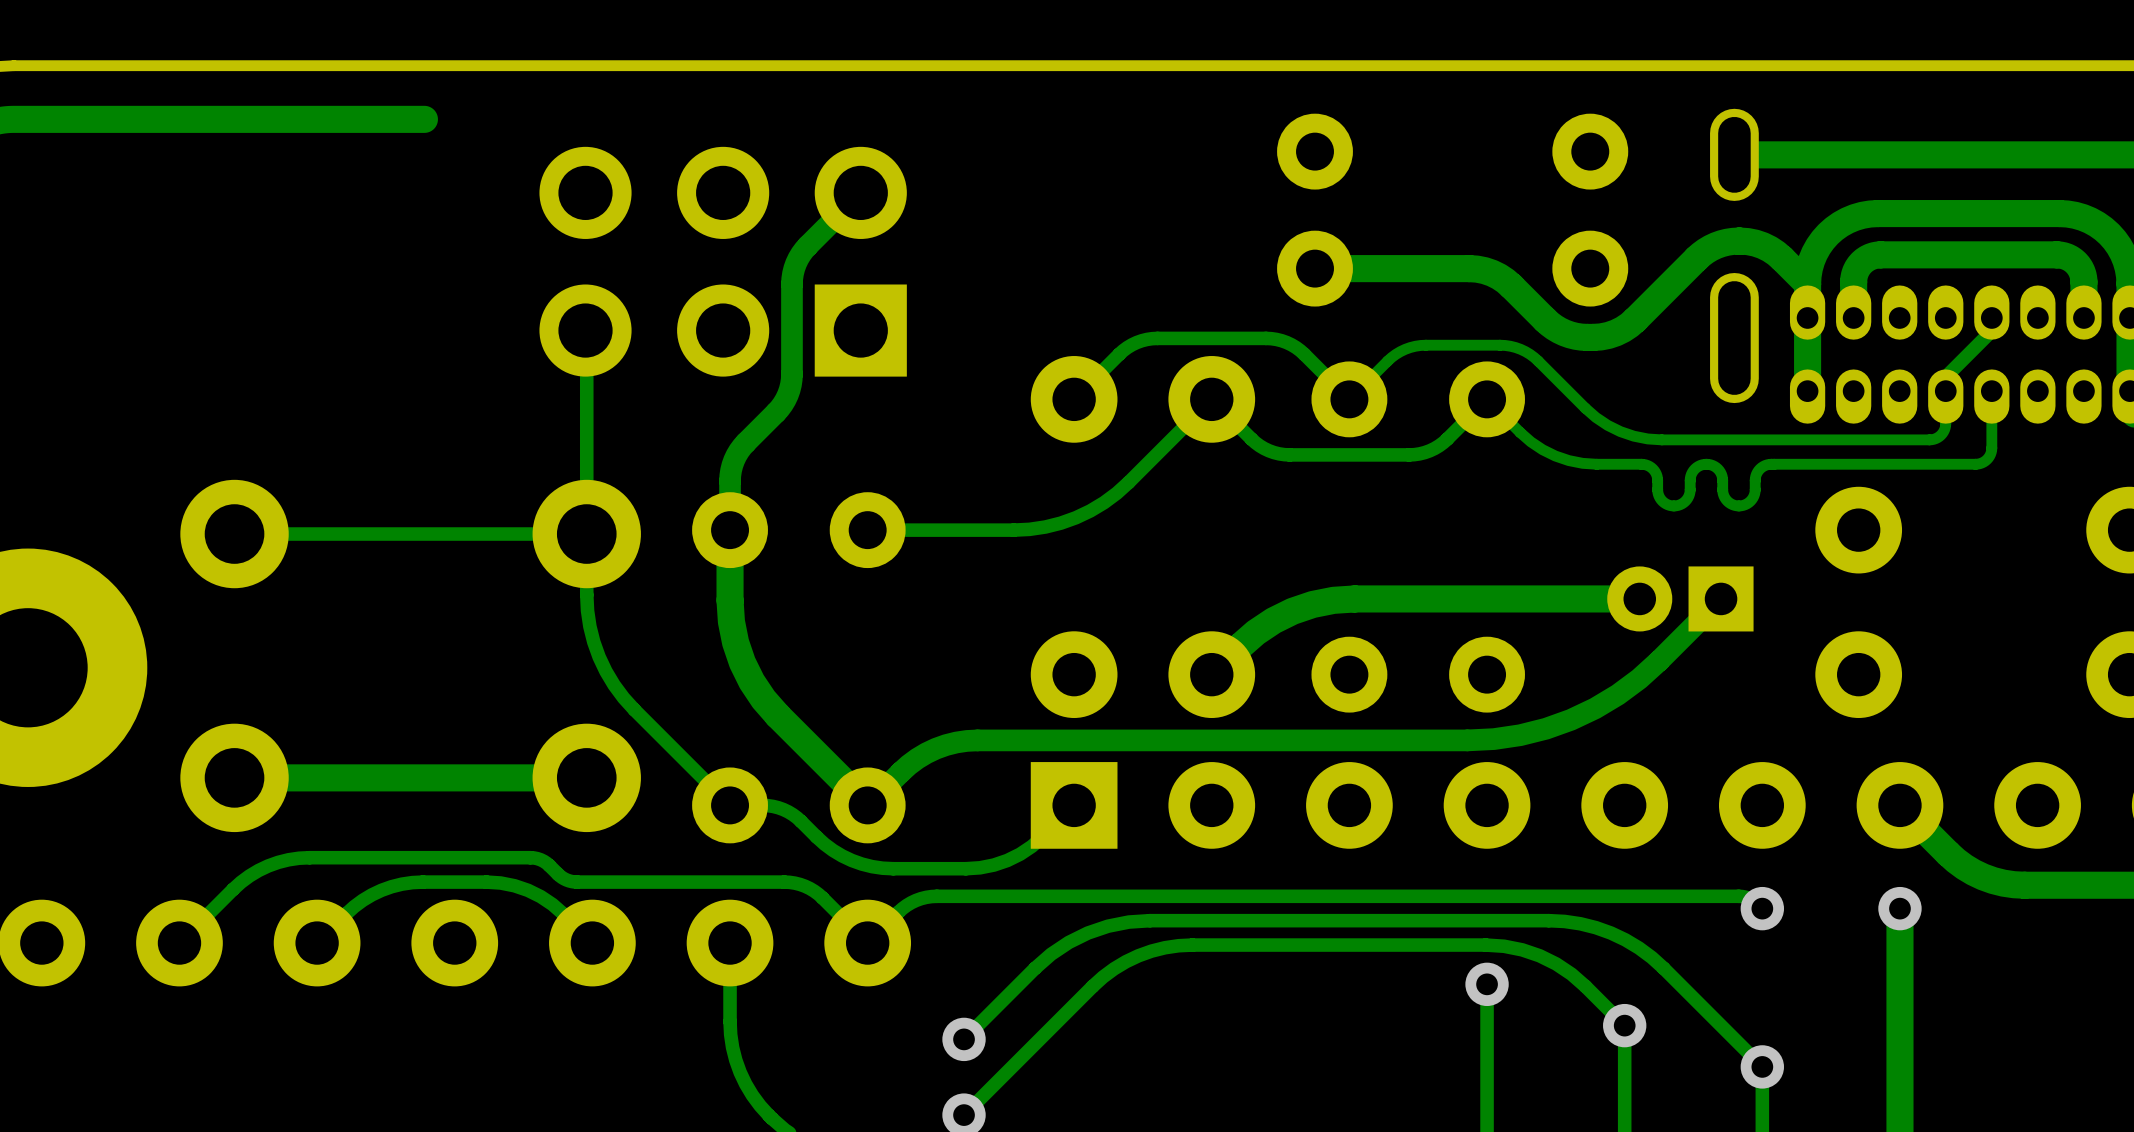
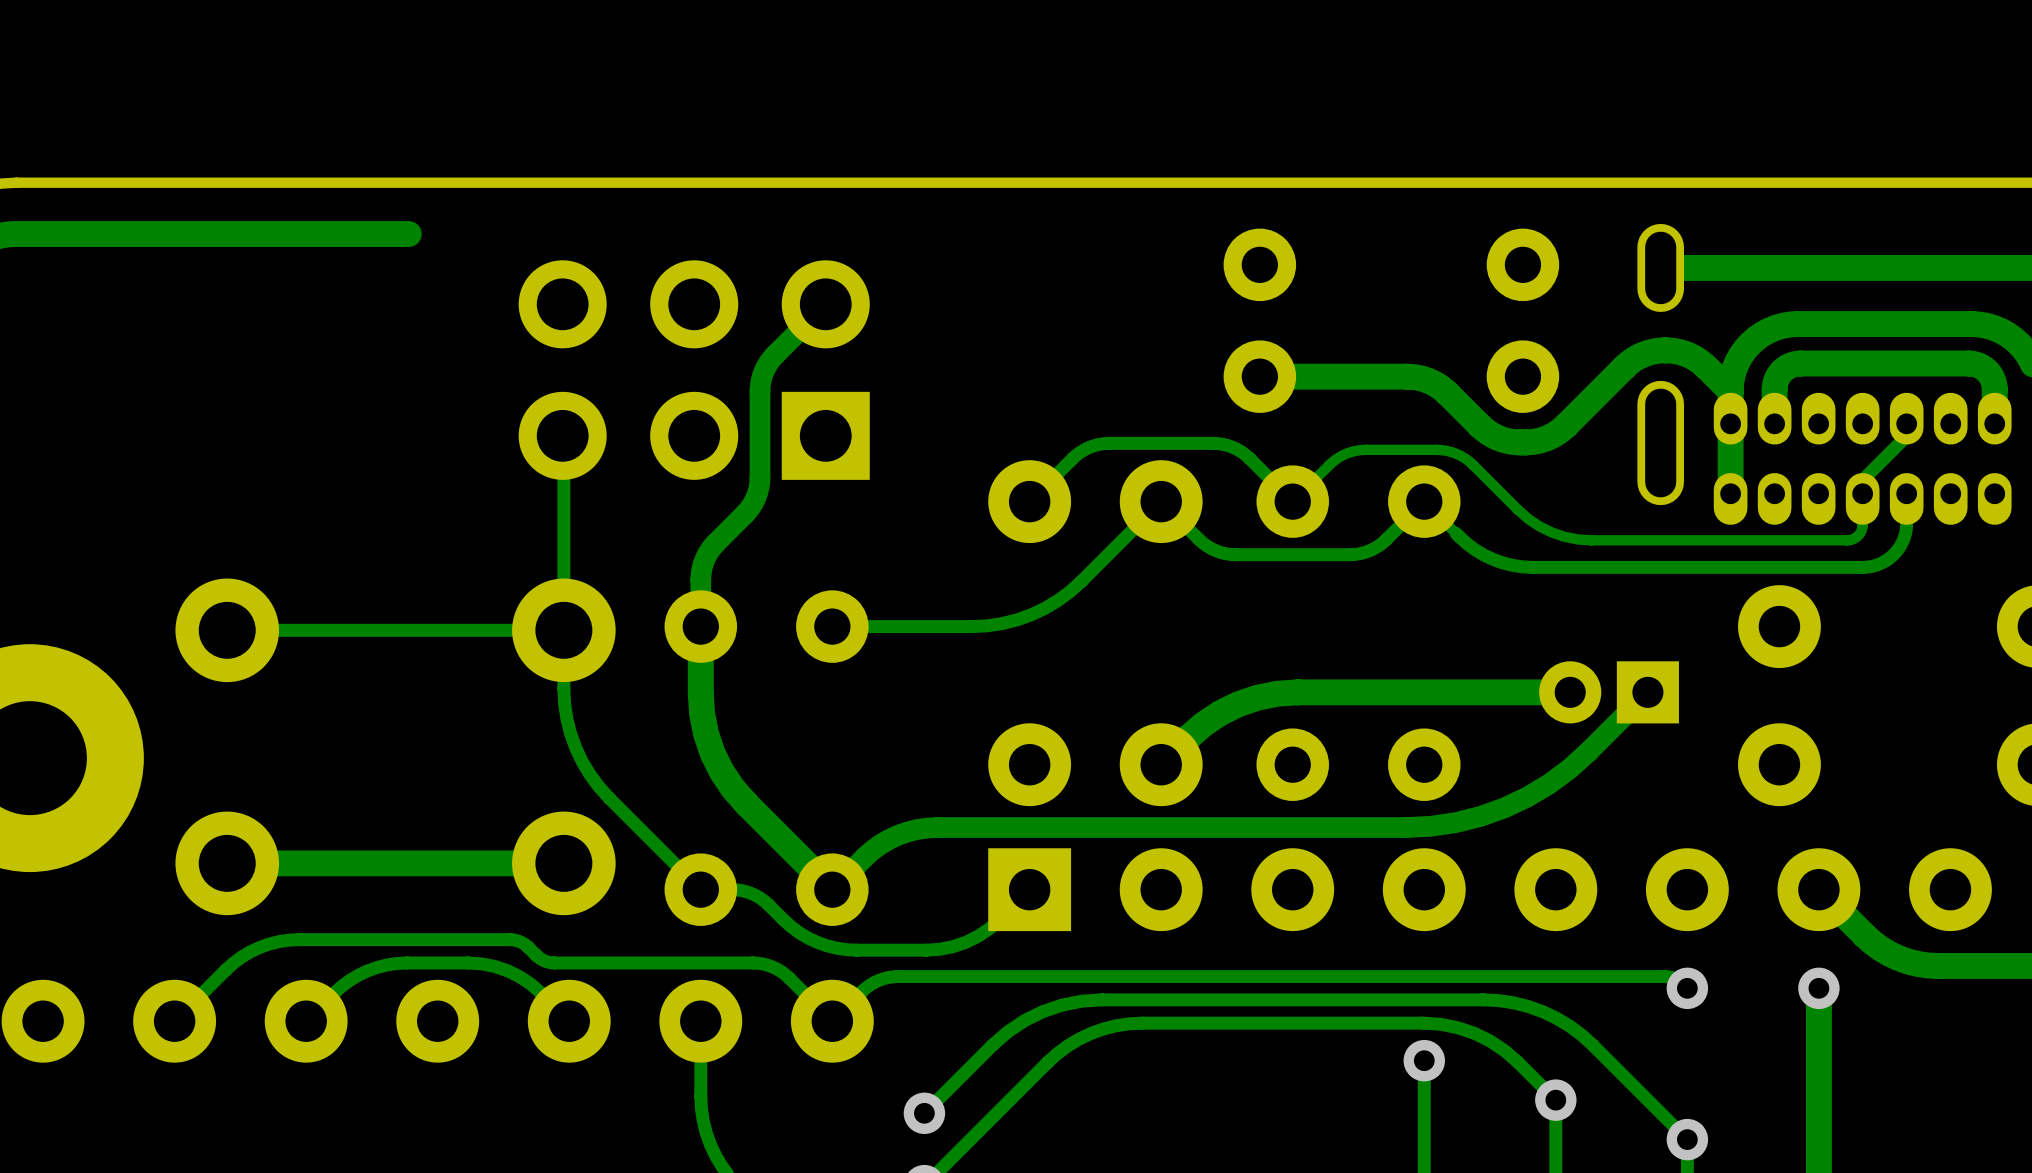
track: (1991, 422) (1991, 452) (1987, 459) (1979, 463) (1769, 464) (1763, 466) (1757, 472) (1754, 493) (1751, 499) (1745, 504) (1738, 505) (1730, 503) (1726, 499) (1722, 491) (1721, 474) (1716, 467) (1710, 464) (1702, 464) (1694, 469) (1690, 476) (1688, 497) (1680, 504) (1671, 505) (1664, 502) (1659, 497) (1656, 474) (1647, 465) (1596, 464) (1568, 460) (1542, 449) (1520, 432) -> (1906, 523) (1902, 542) (1893, 554) (1877, 564) (1862, 567) (1522, 566) (1502, 562) (1484, 555) (1455, 533)

